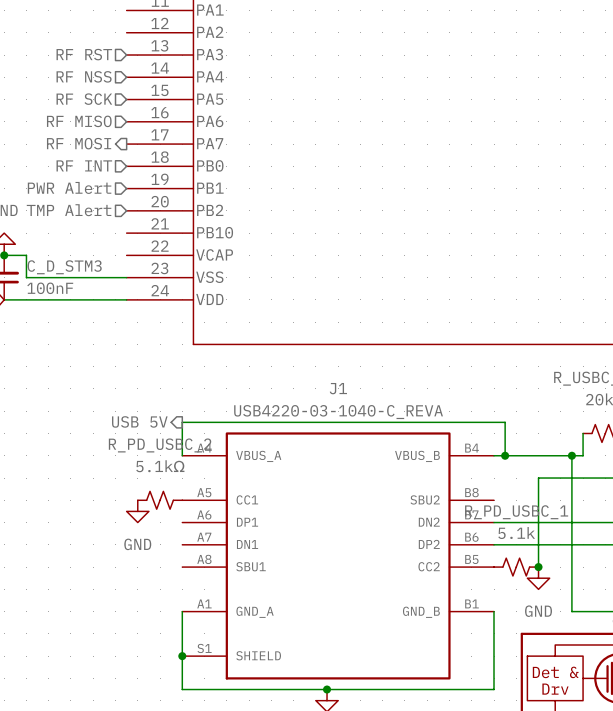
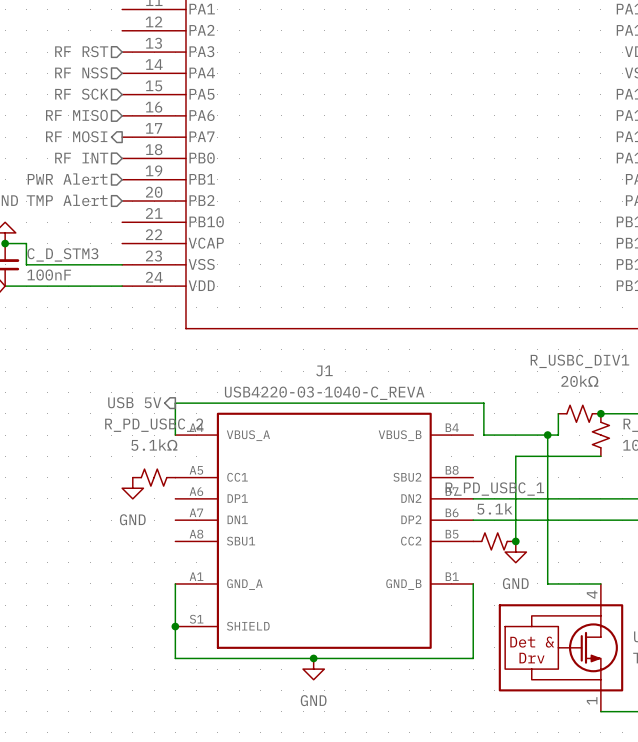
wire: (494, 455) (505, 455) -> none
junction: (505, 455) -> none

